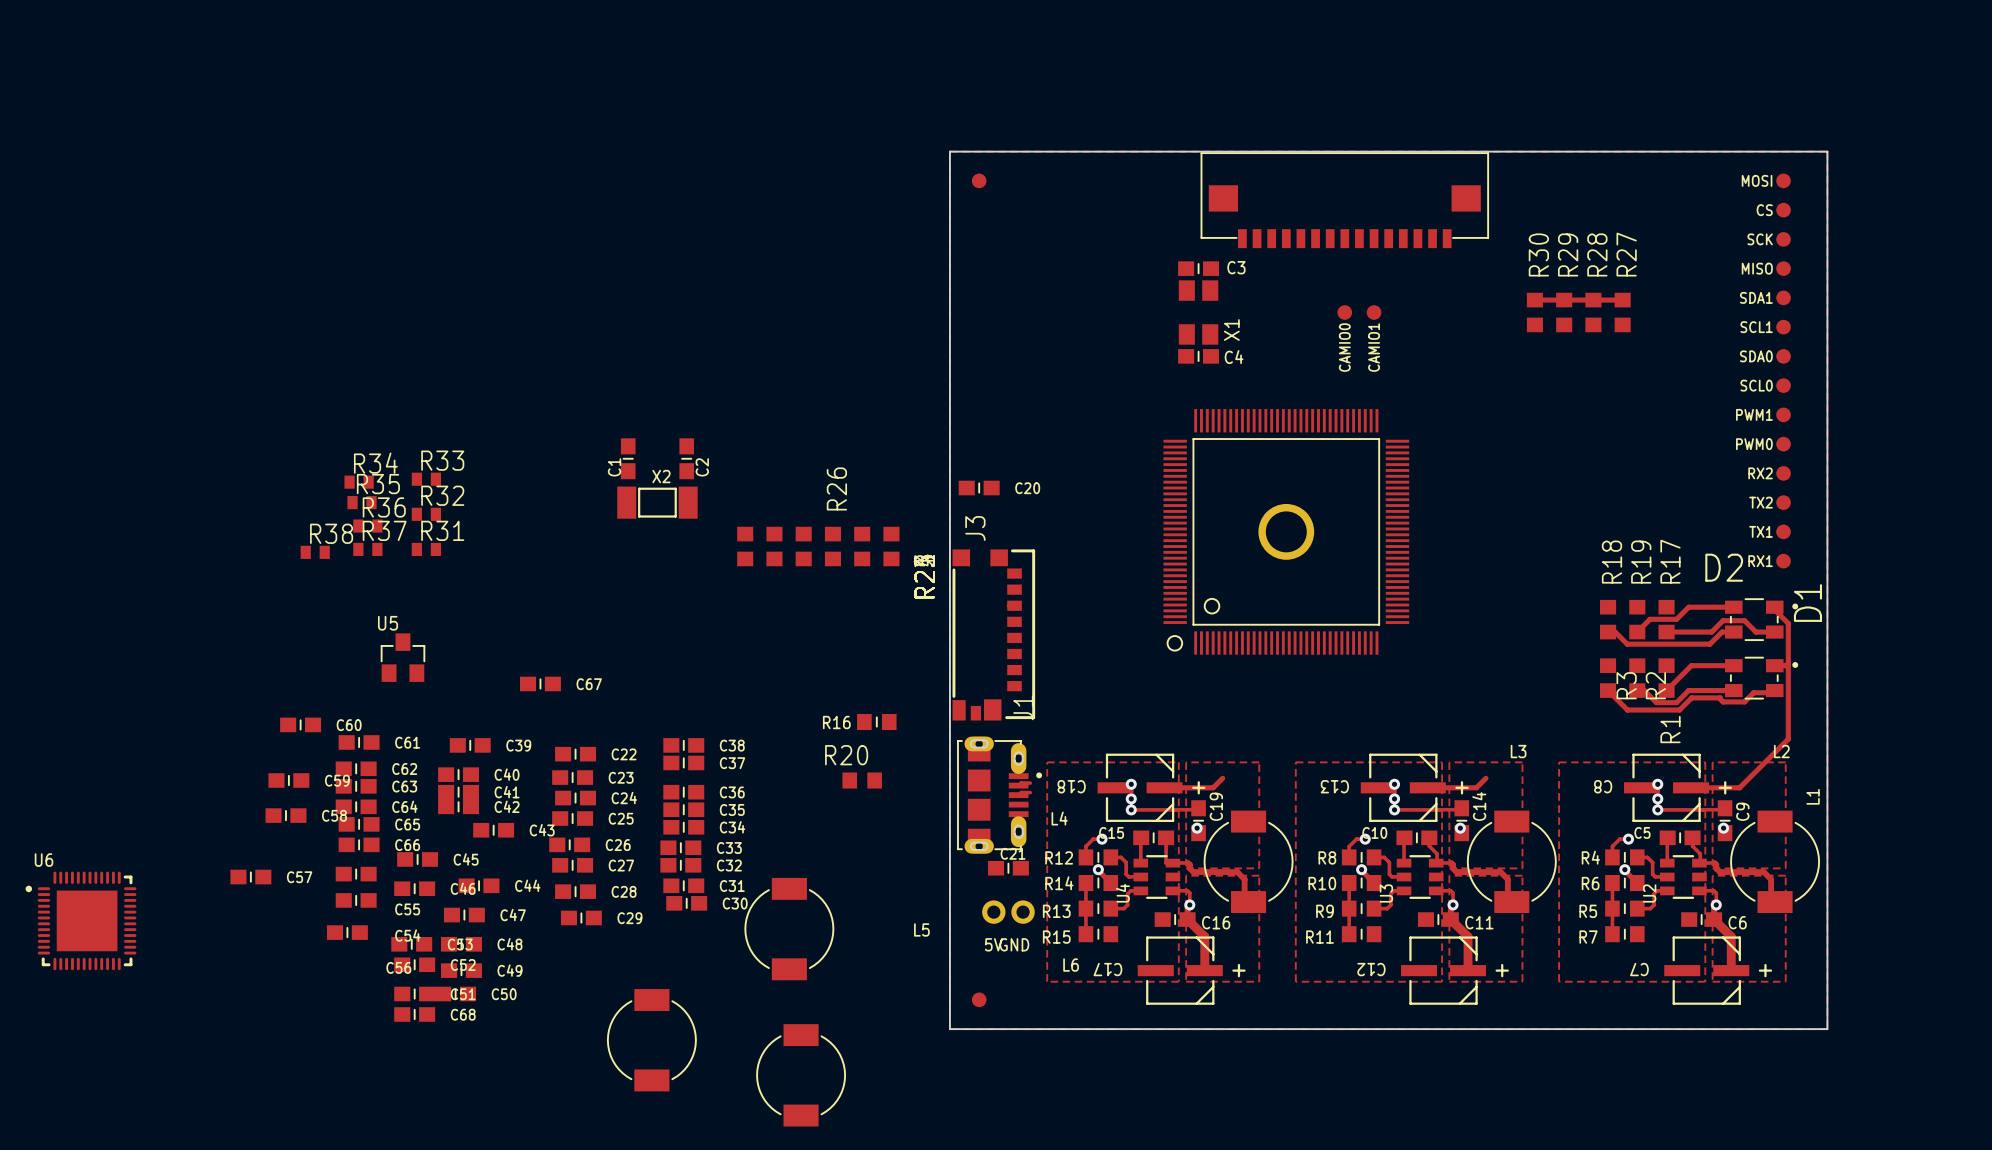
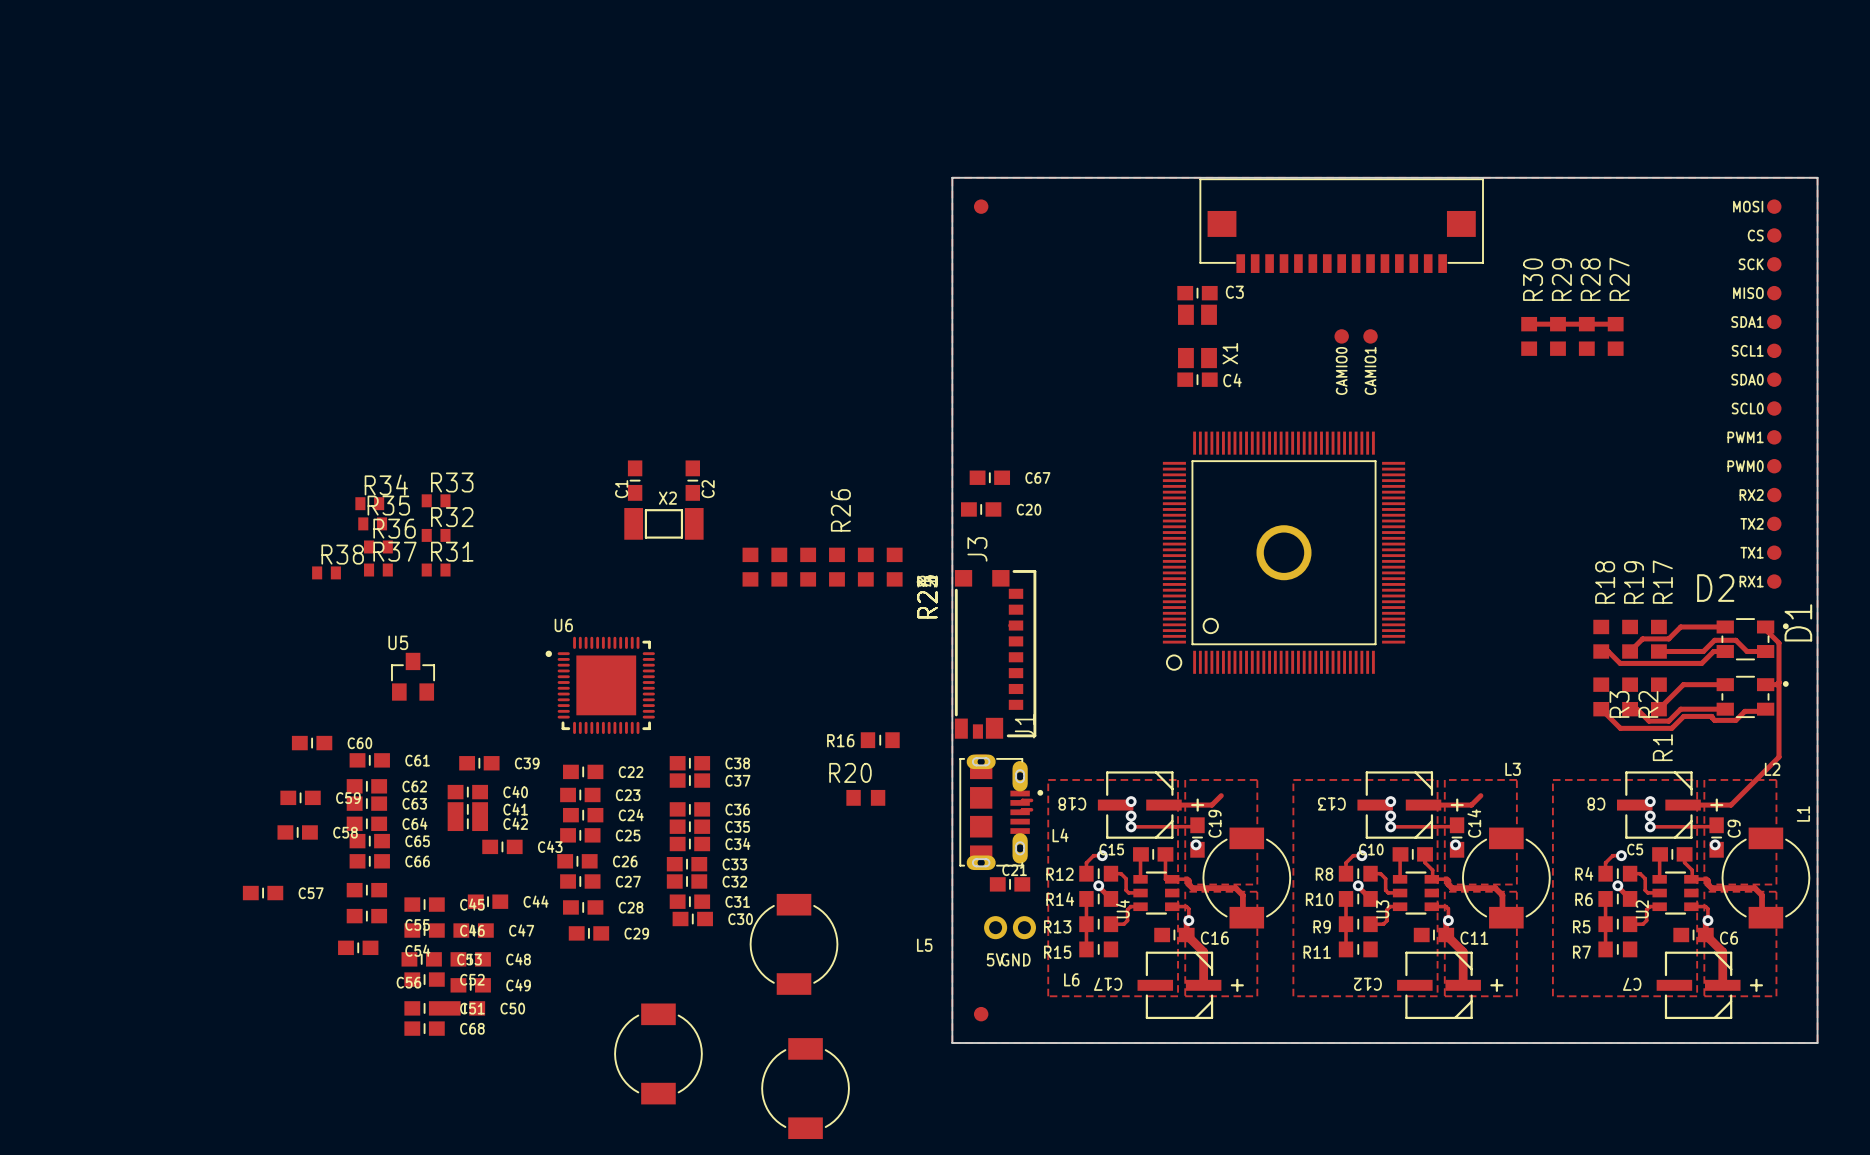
C67 position: (540, 683) -> (989, 477)
C45: (417, 859) -> none
C46 name: C46 (463, 888) -> C45 (472, 904)
C46: none -> (424, 930)
U6 position: (81, 920) -> (600, 685)

